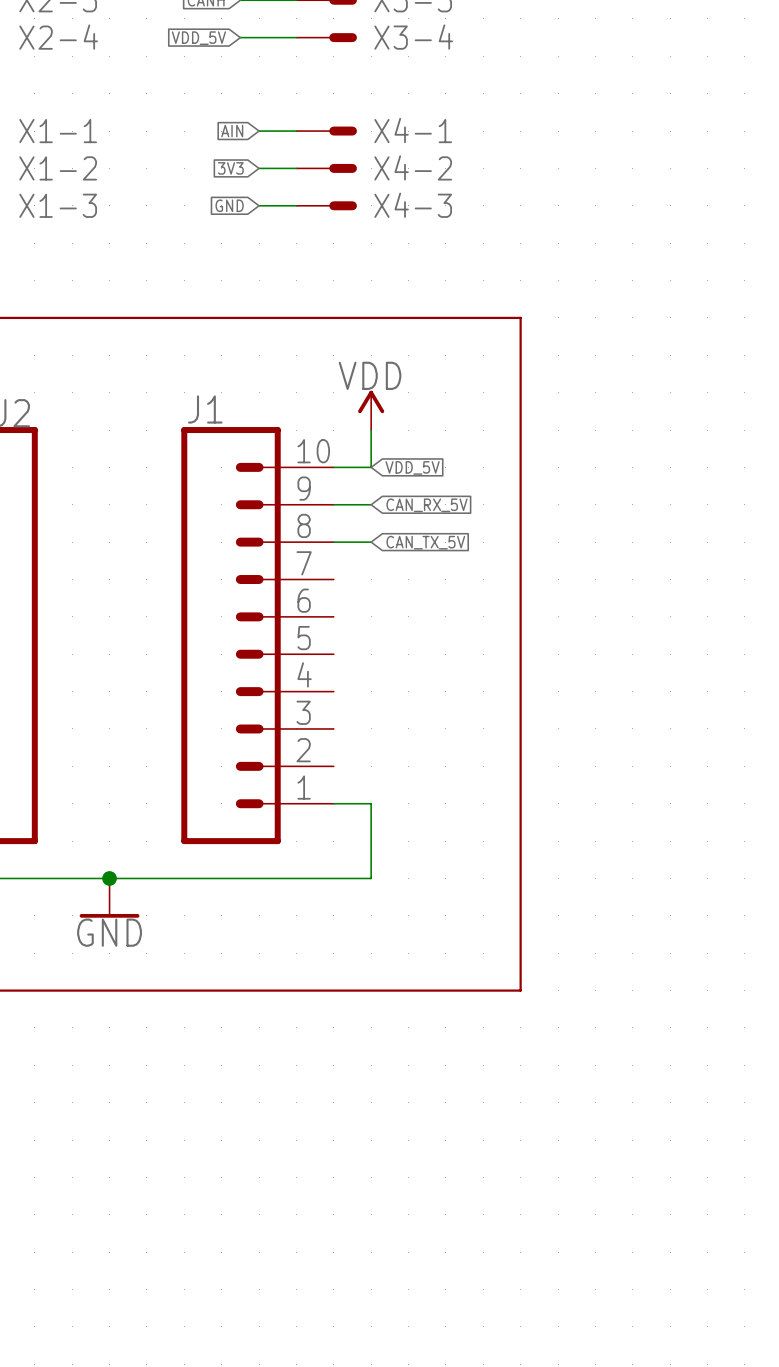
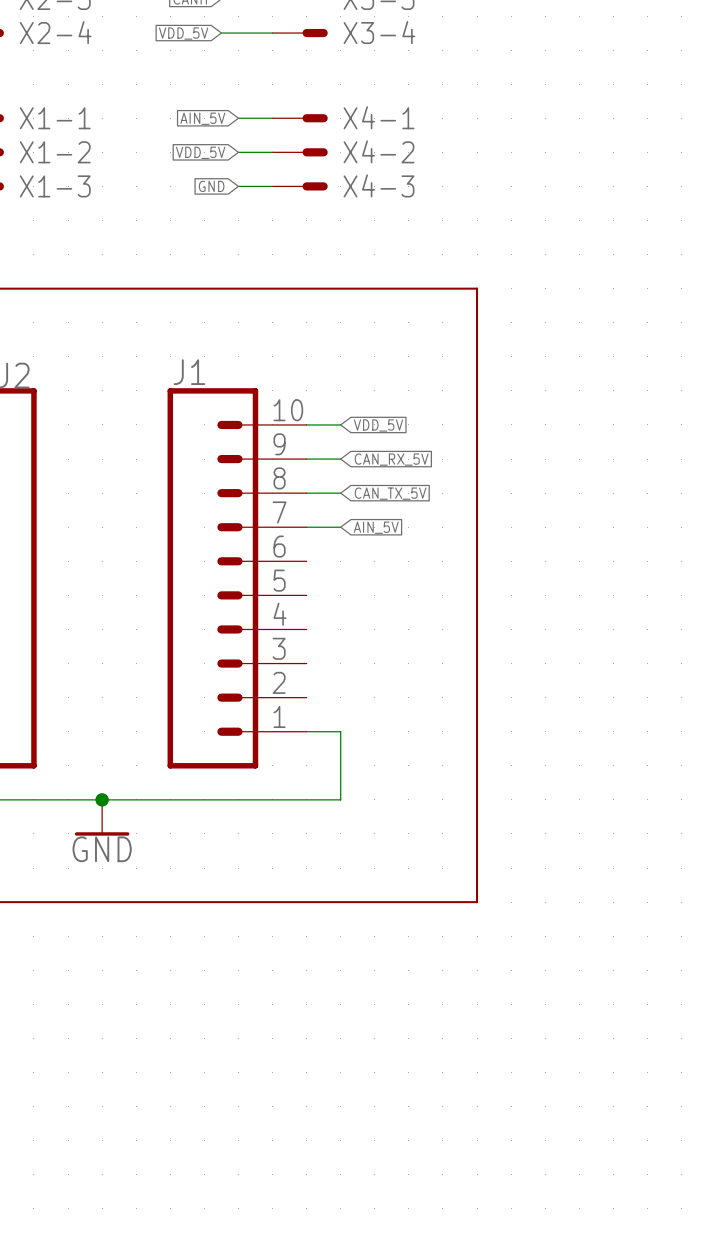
global label: AIN (232, 131) -> AIN_5V (202, 118)
global label: 3V3 (230, 168) -> VDD_5V (200, 152)
power symbol: VDD (371, 410) -> none
wire: (371, 430) (371, 467) -> none
wire: none -> (306, 527) (340, 527)
global label: none -> AIN_5V (376, 527)

